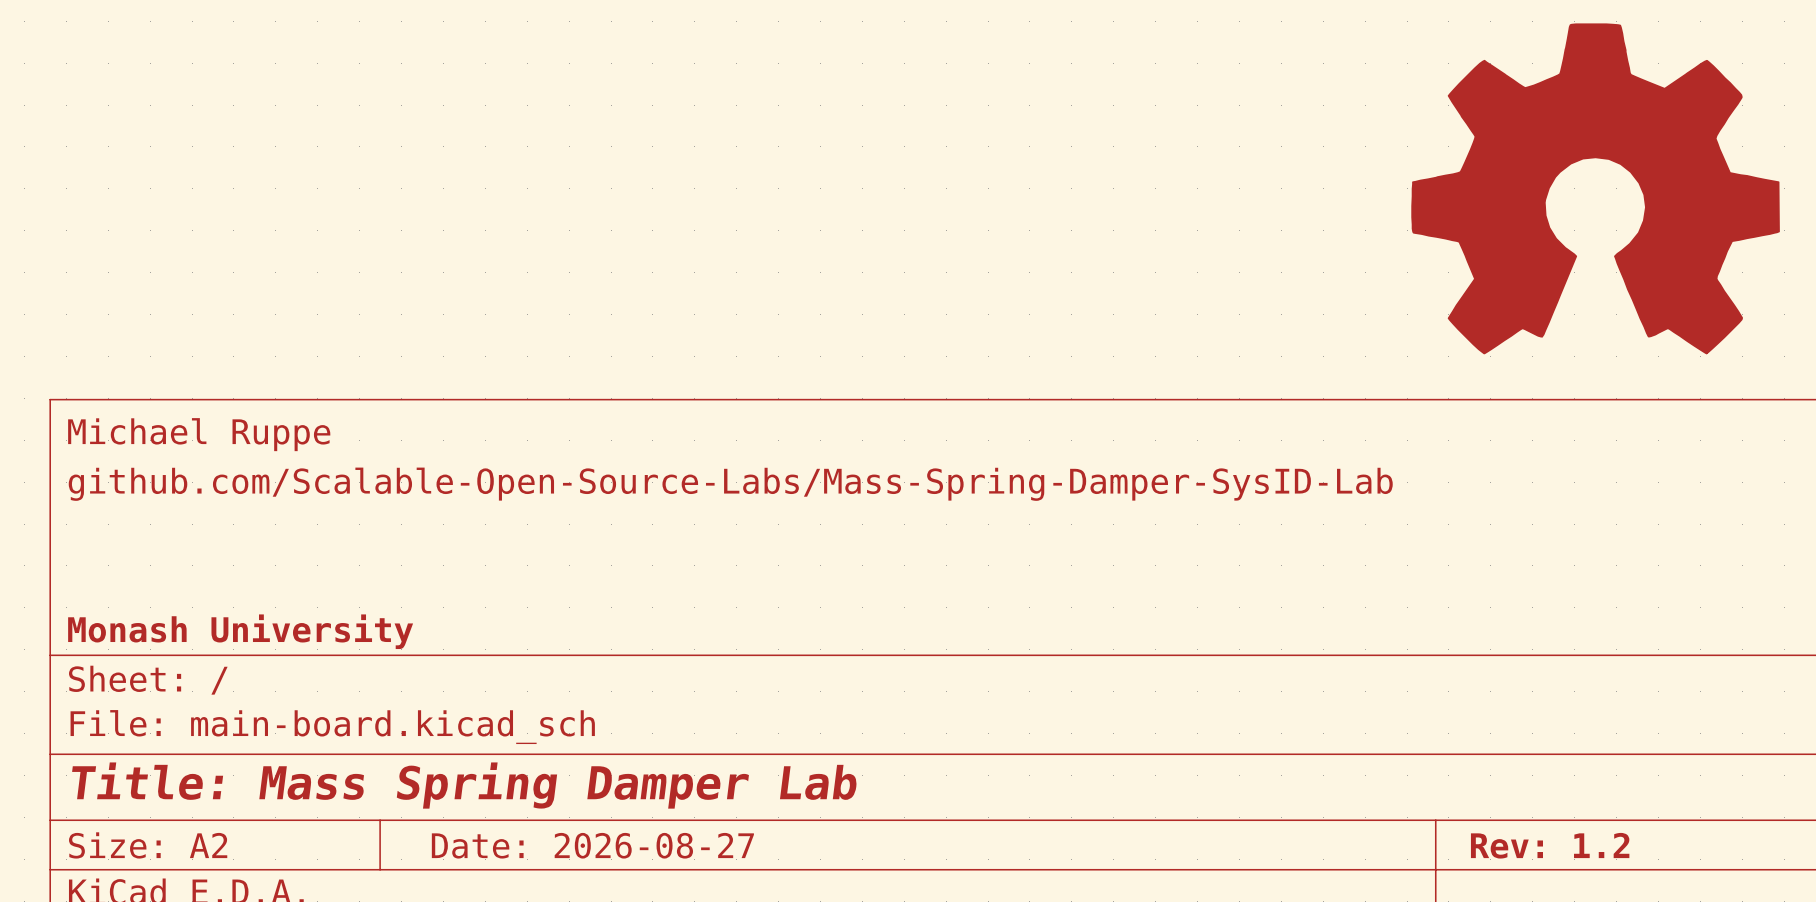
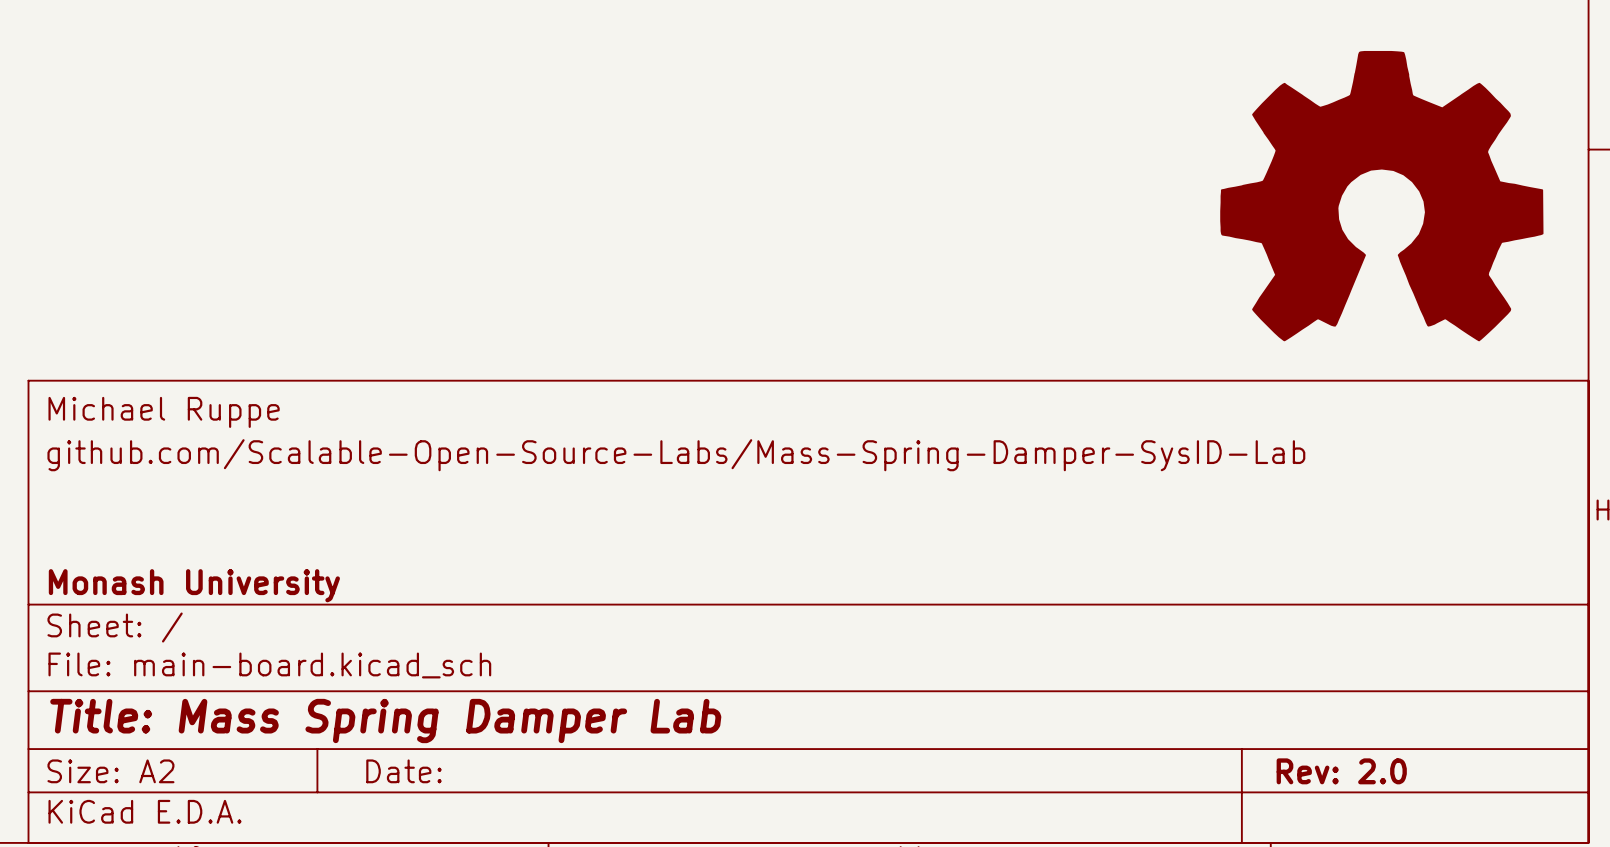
title block: Date: 2026-08-27 (592, 845) -> Date: (403, 771)
title block: Rev: 1.2 (1550, 845) -> Rev: 2.0 (1341, 771)

